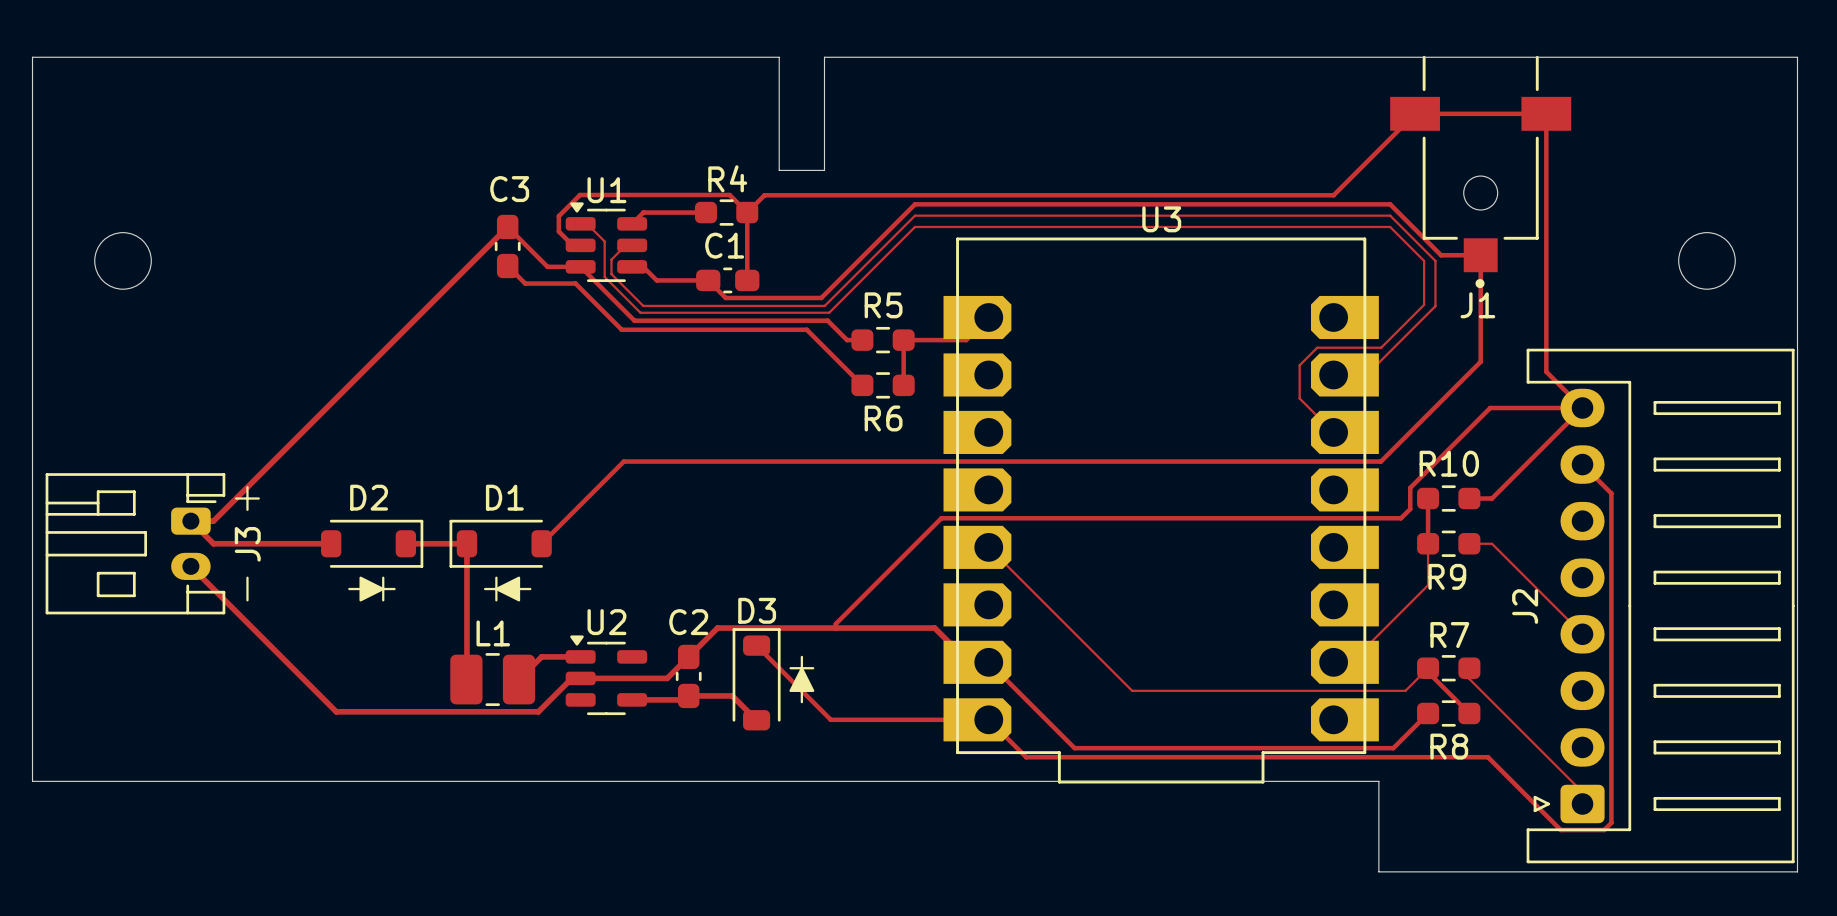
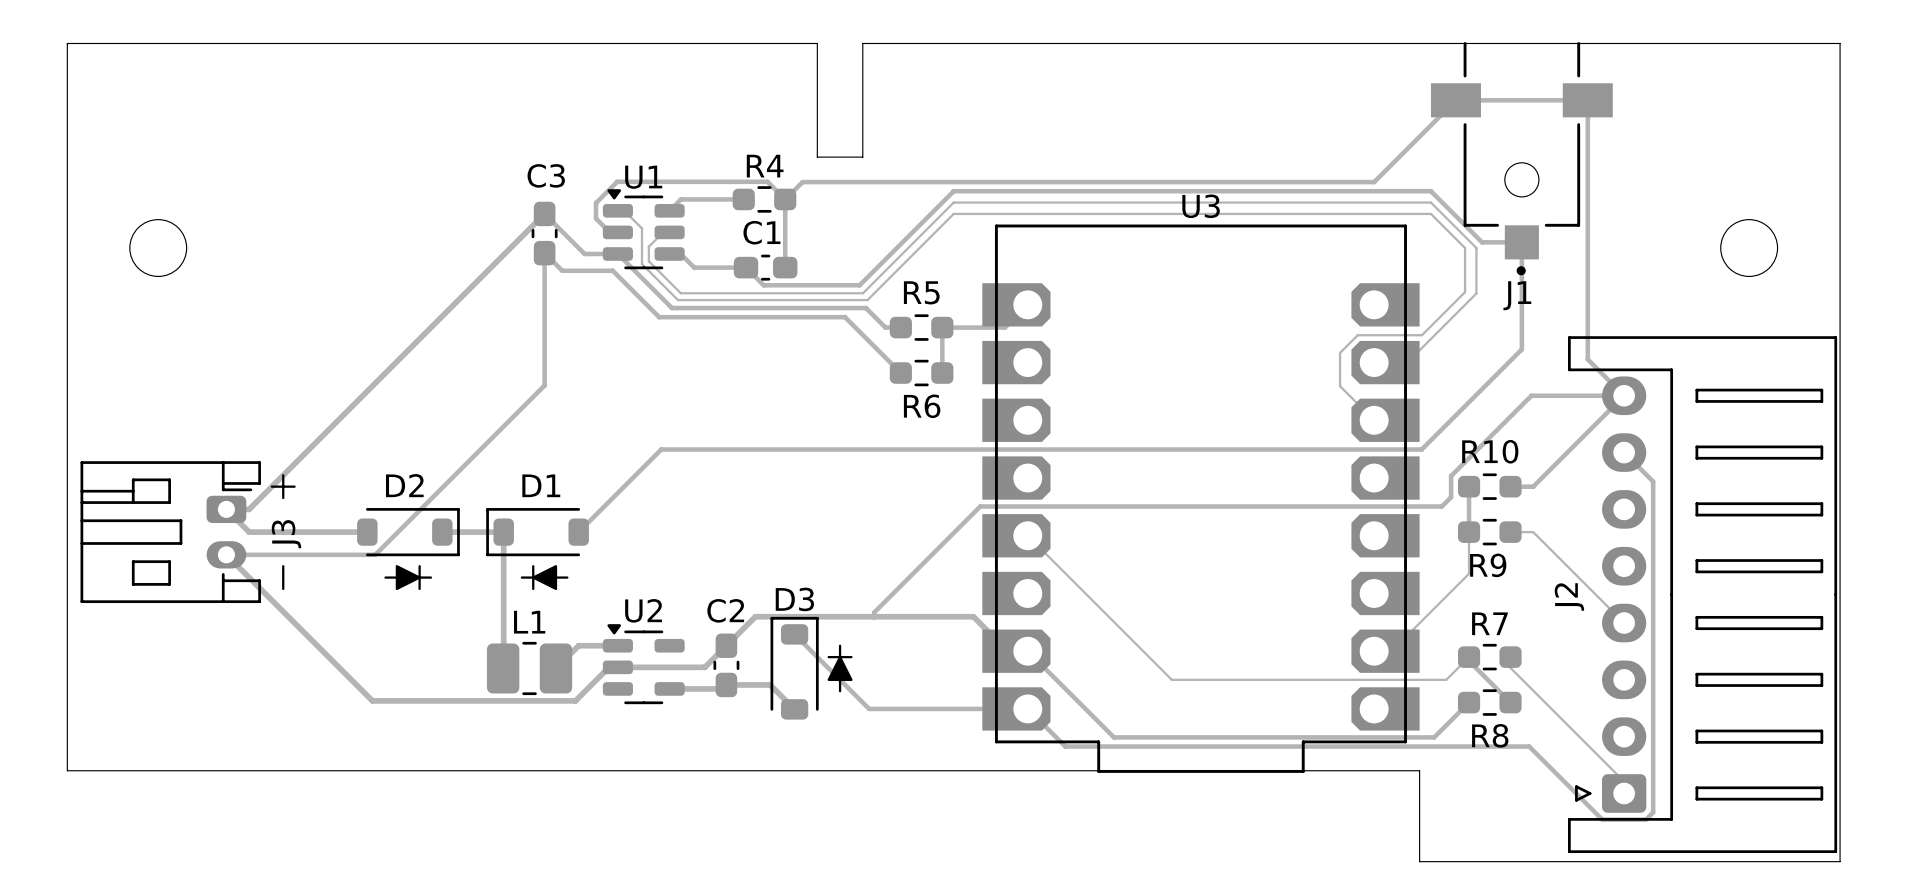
track: none -> (544, 253) (544, 385) (375, 554) (226, 554)

